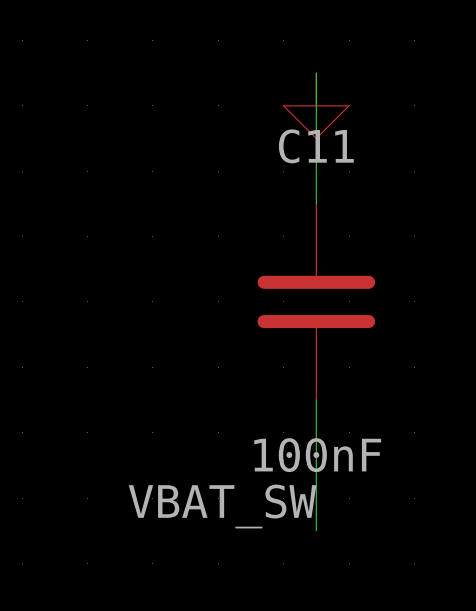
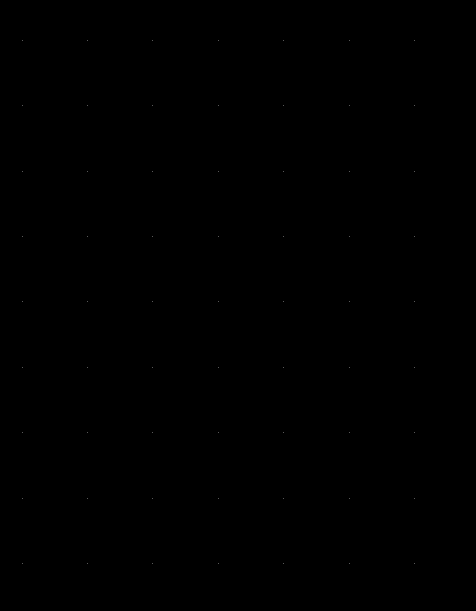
wire: (316, 73) (316, 203) -> none
power symbol: (316, 105) -> none
C11: 100nF (316, 301) -> none
wire: (316, 399) (316, 530) -> none
label: VBAT_SW (222, 506) -> none

